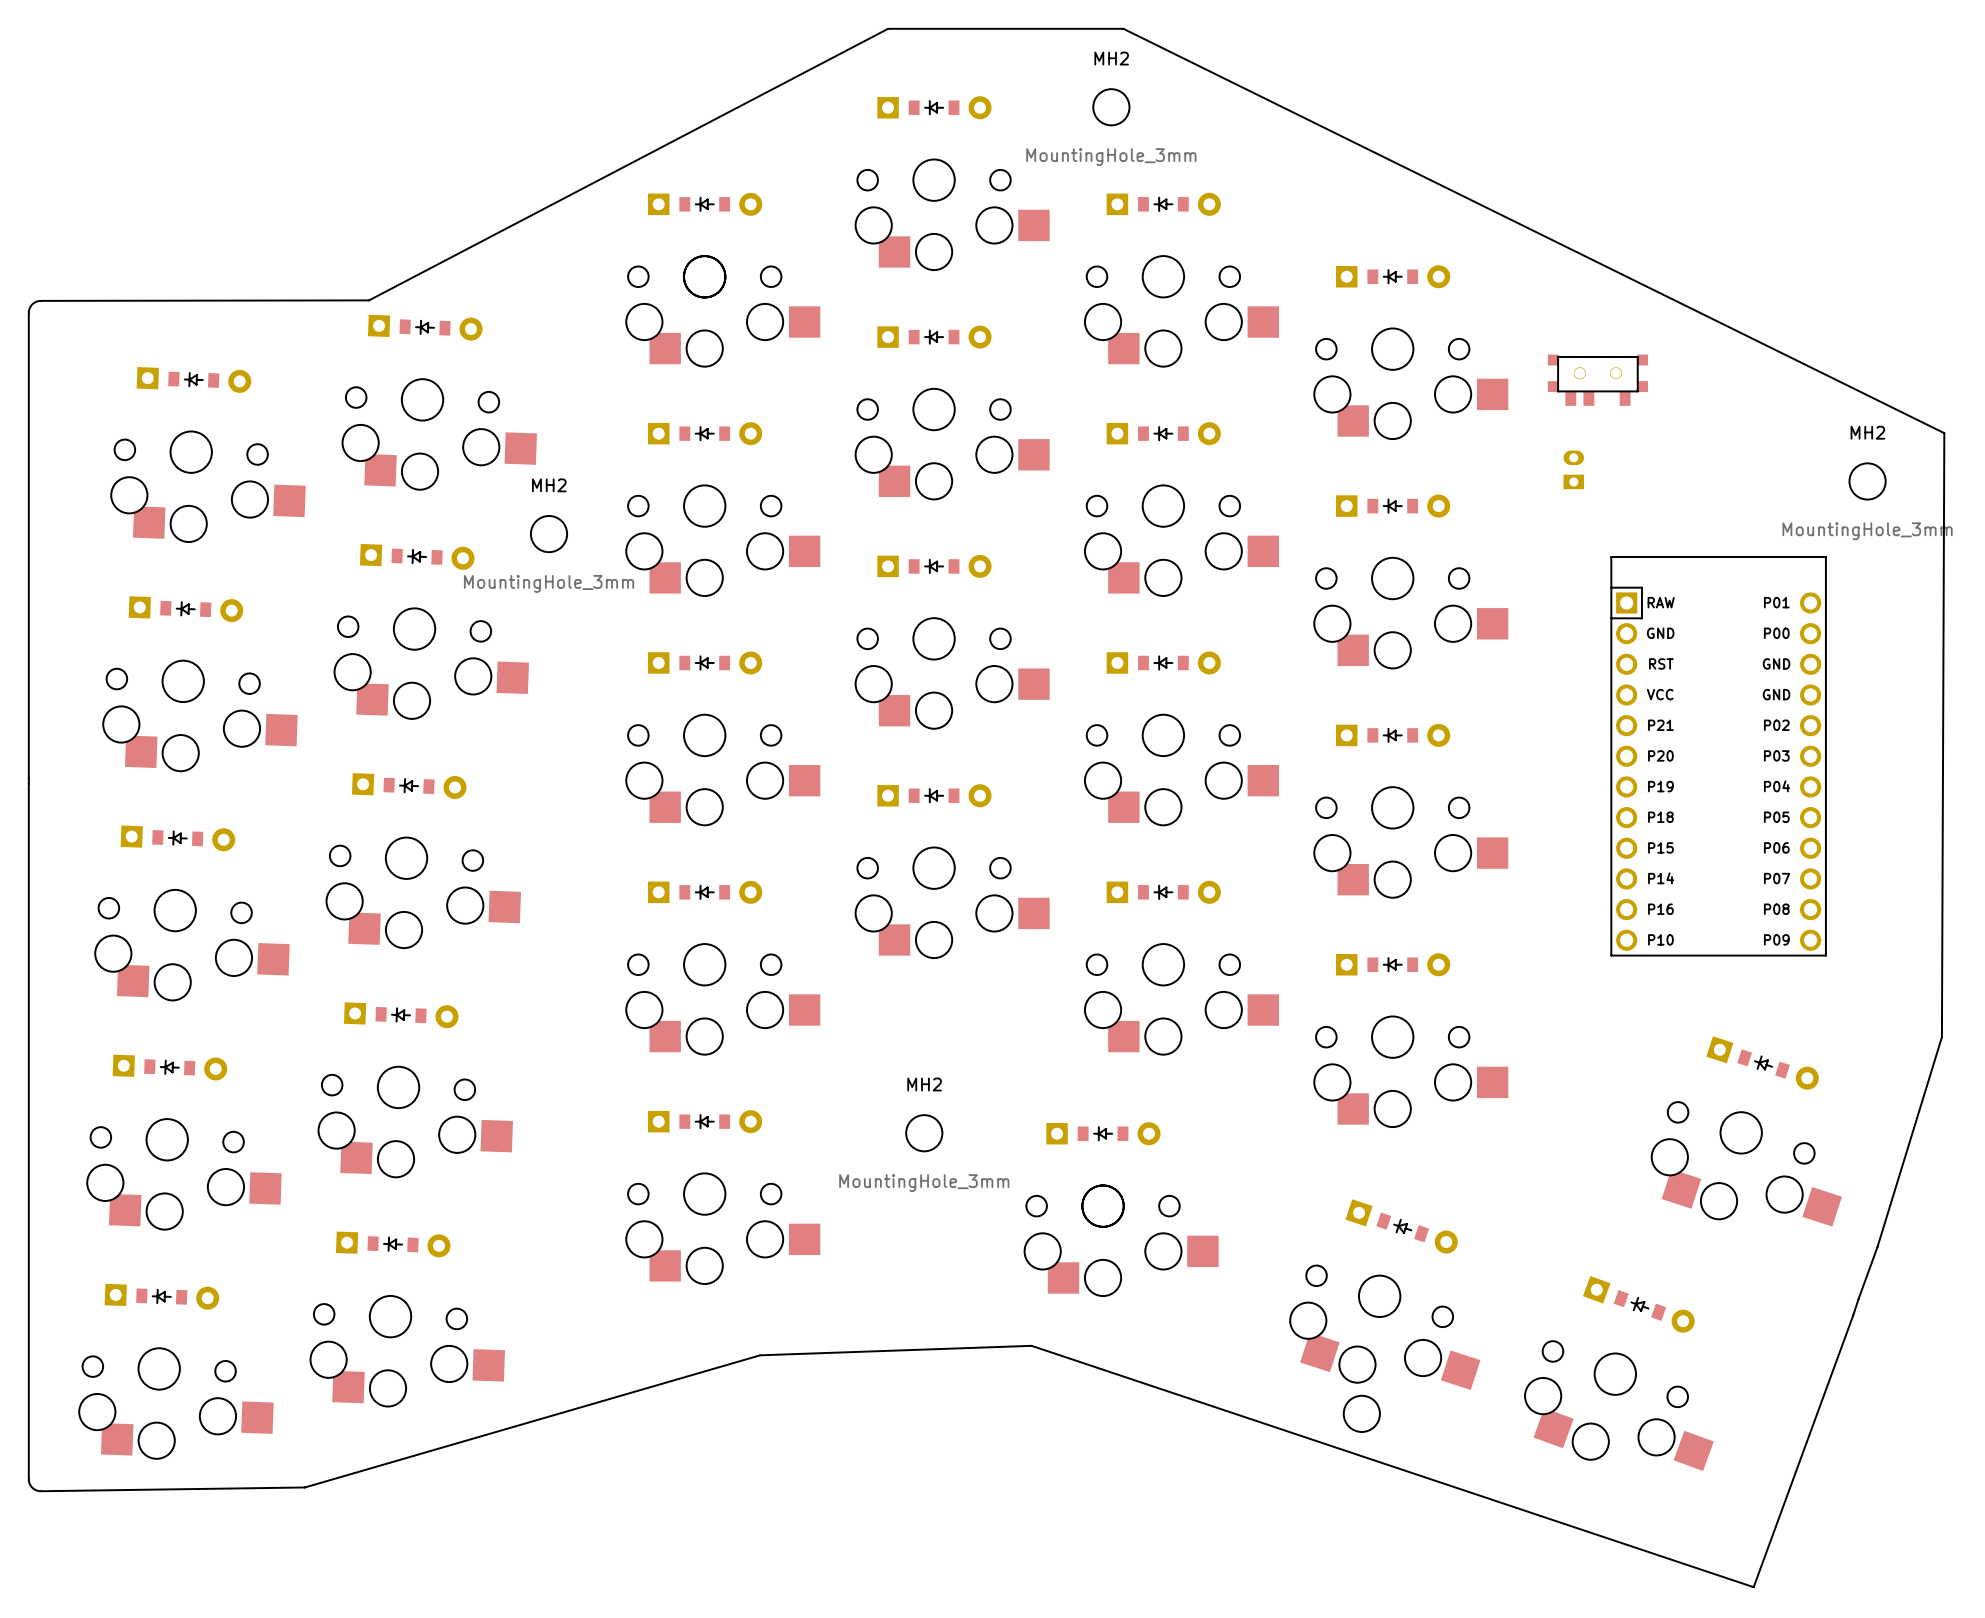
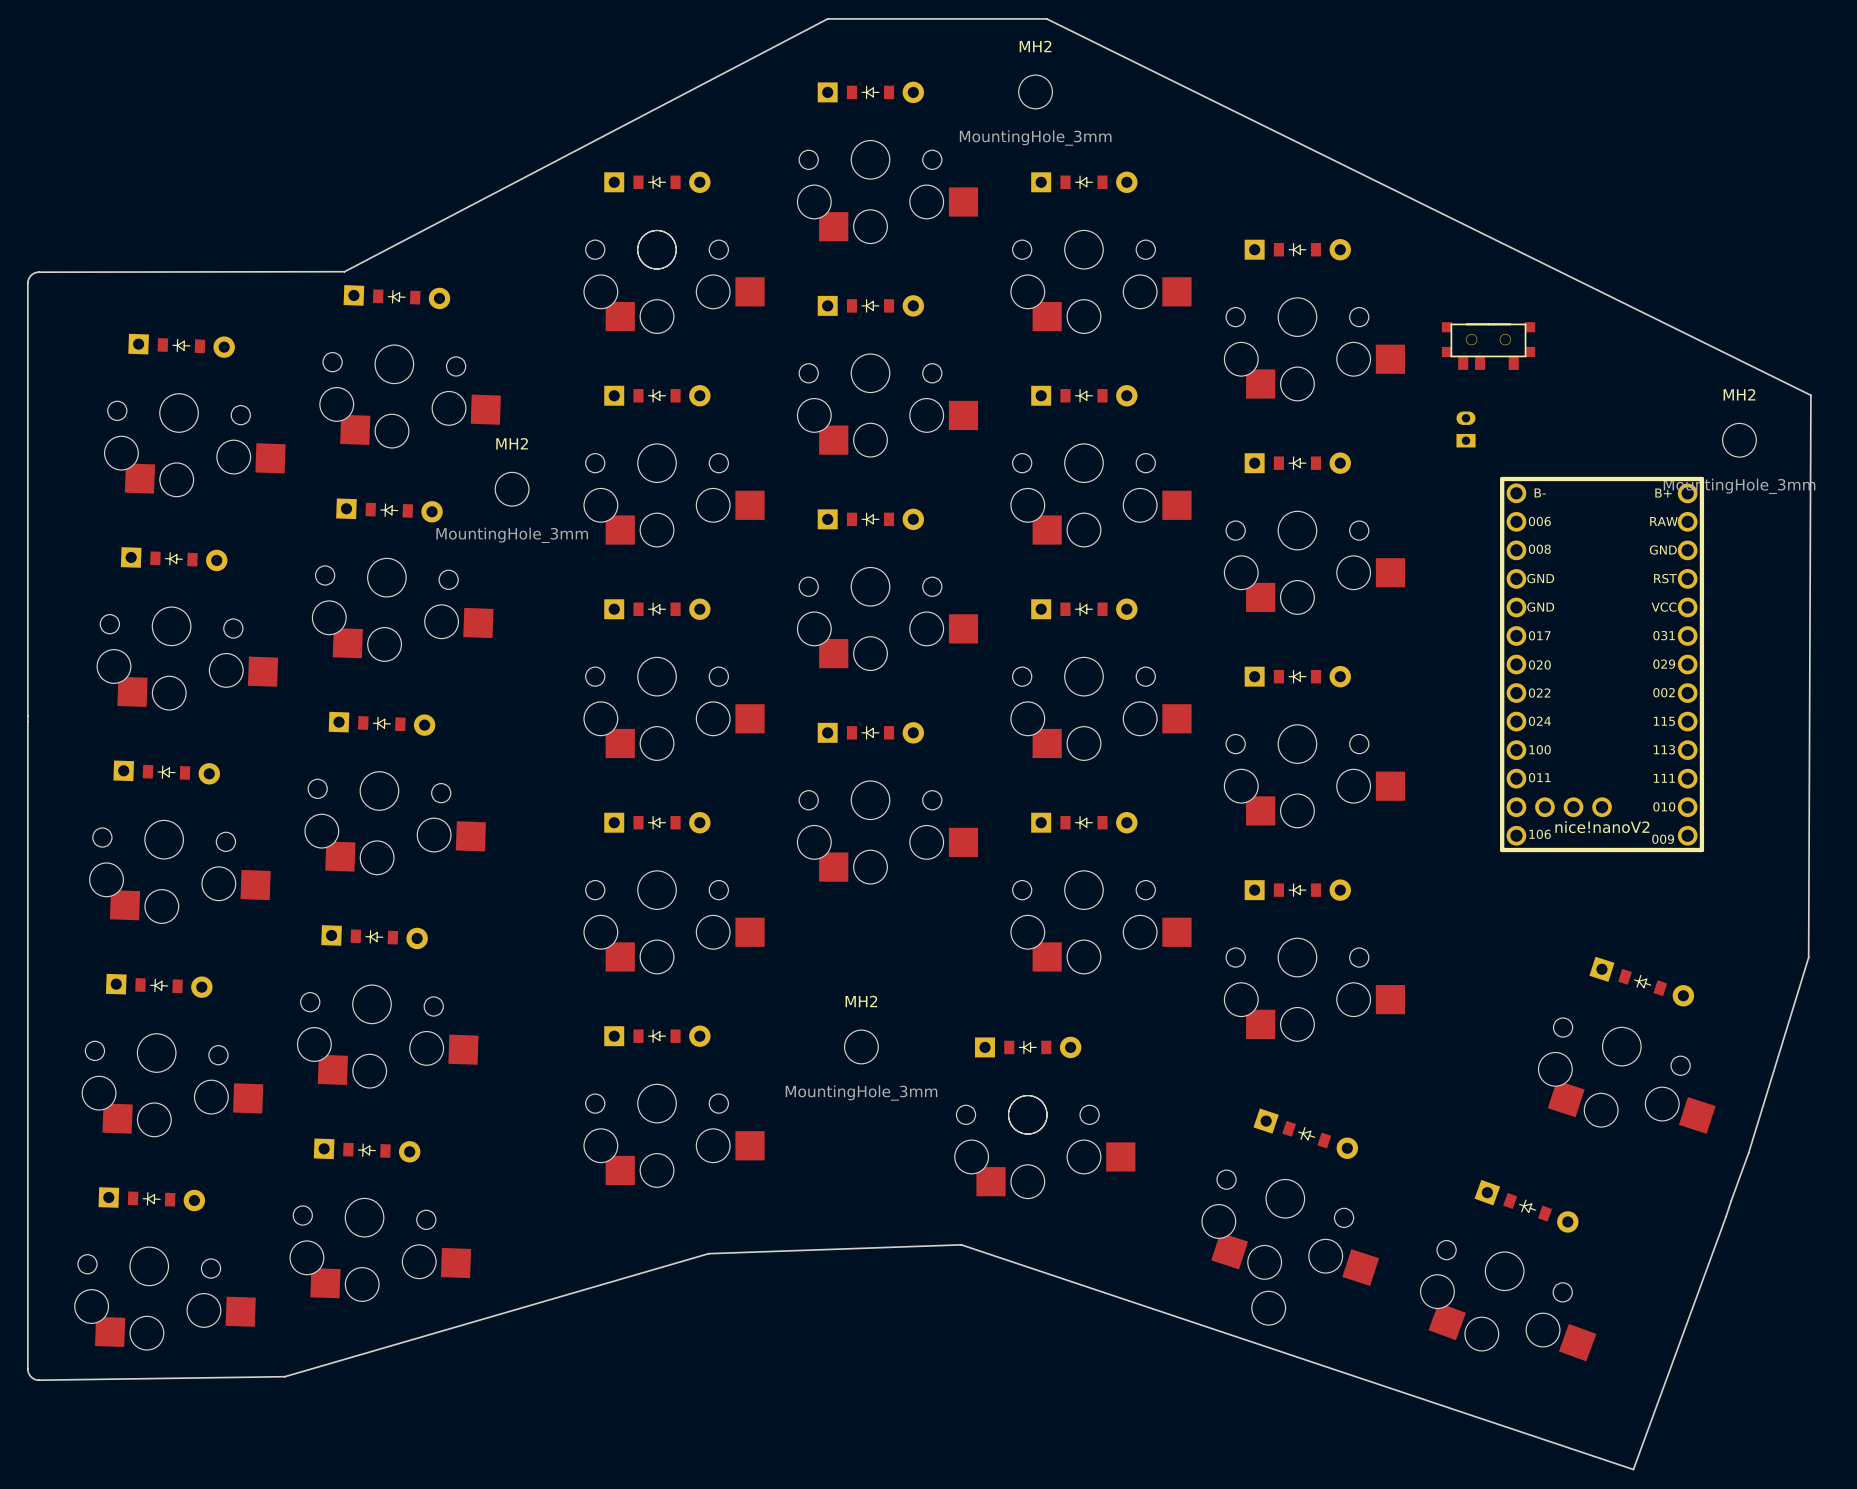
part: none -> (1602, 664)
part: (1718, 756) -> none

